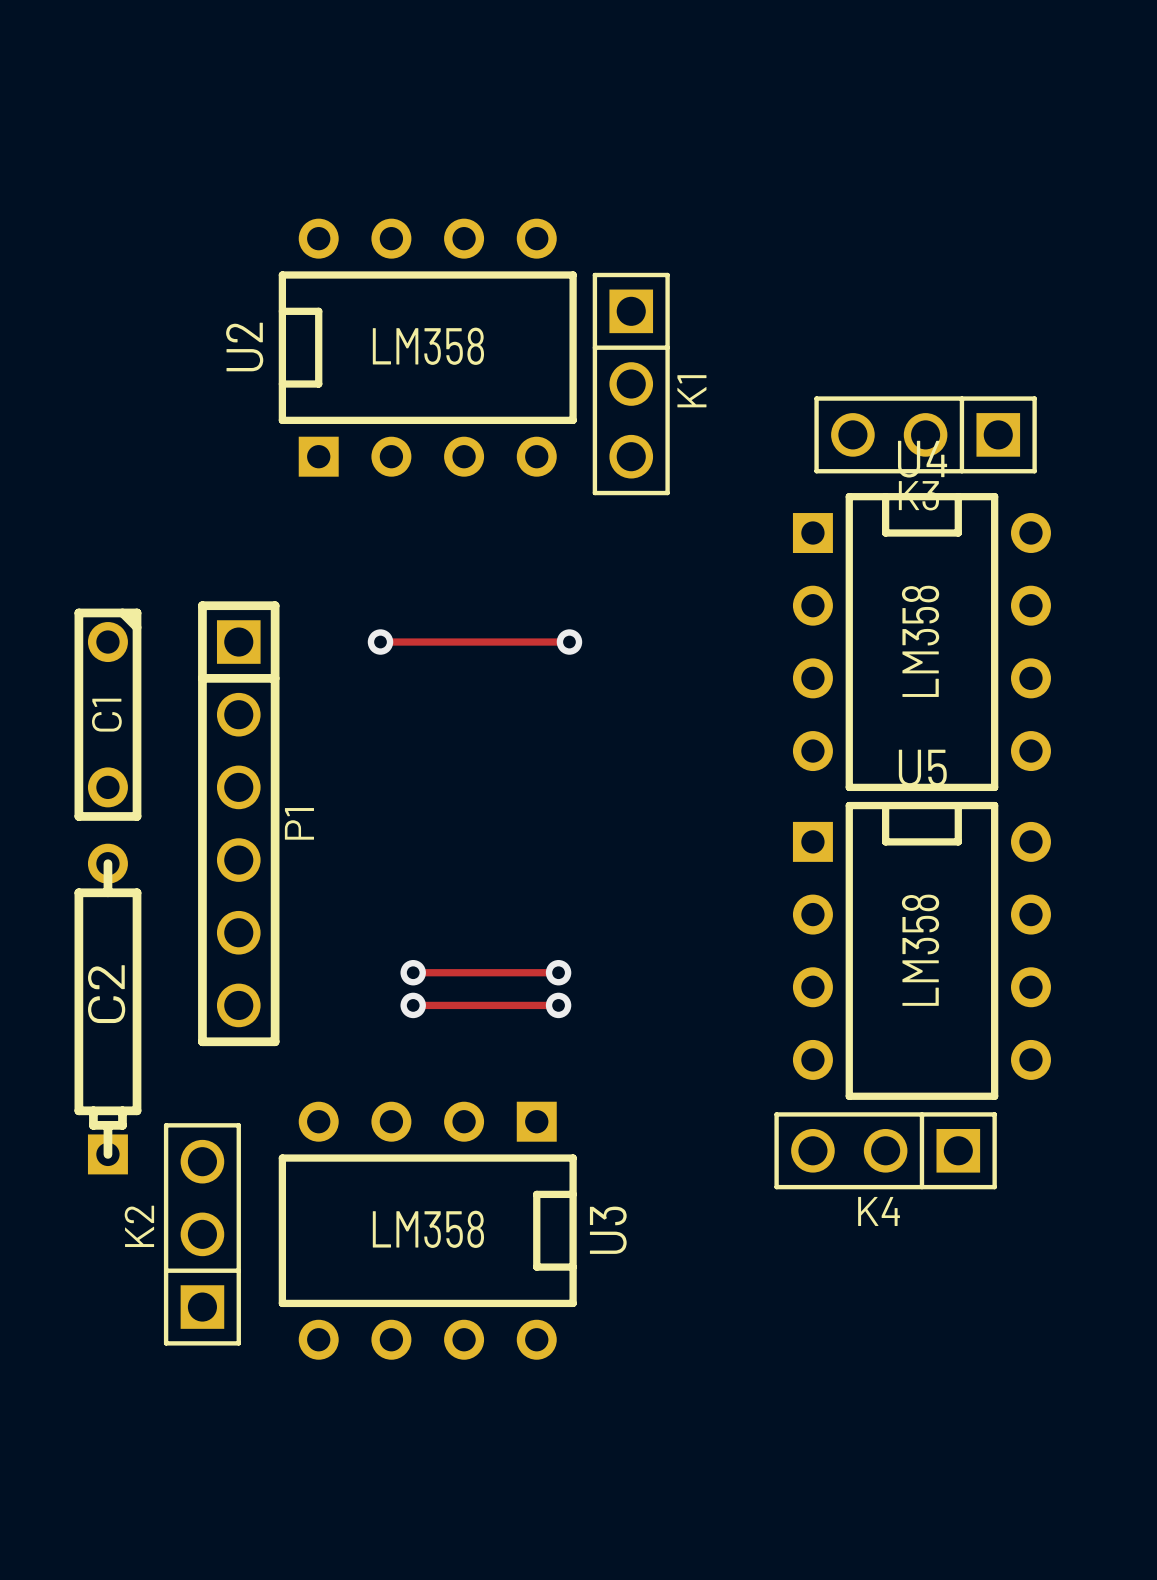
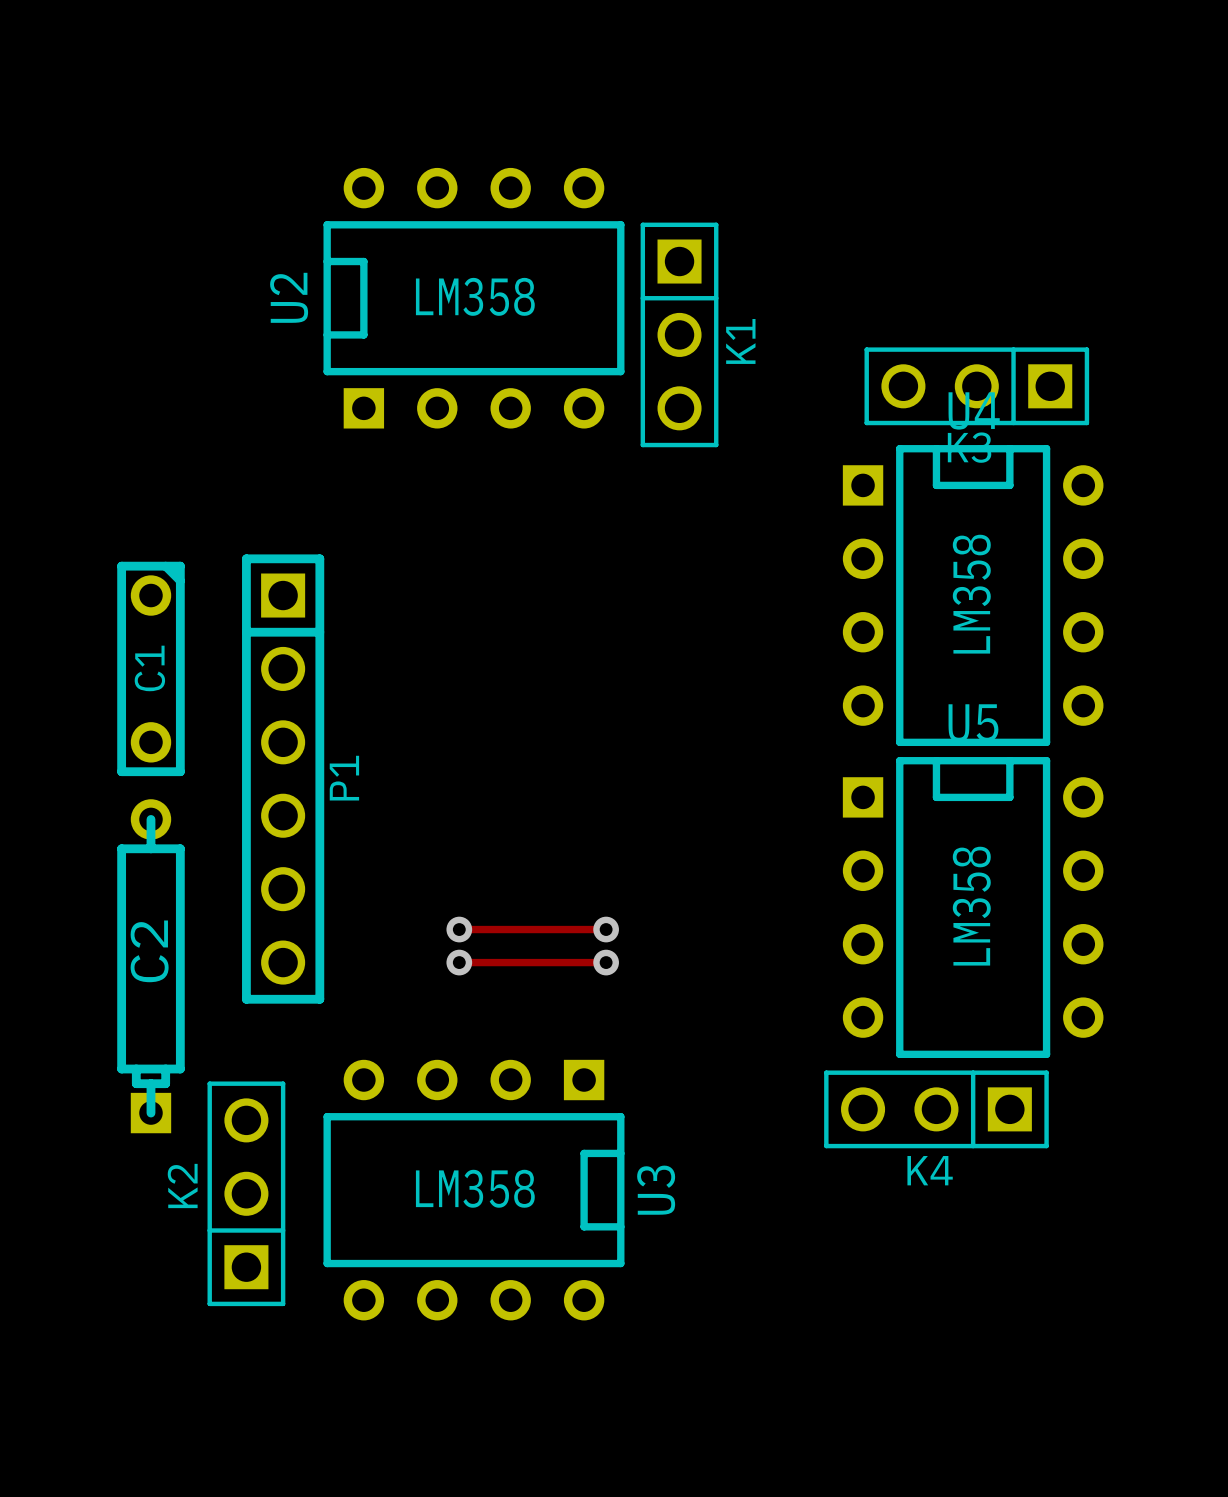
track: (380, 642) (569, 642) -> none
via: (380, 642) -> none
via: (569, 642) -> none

